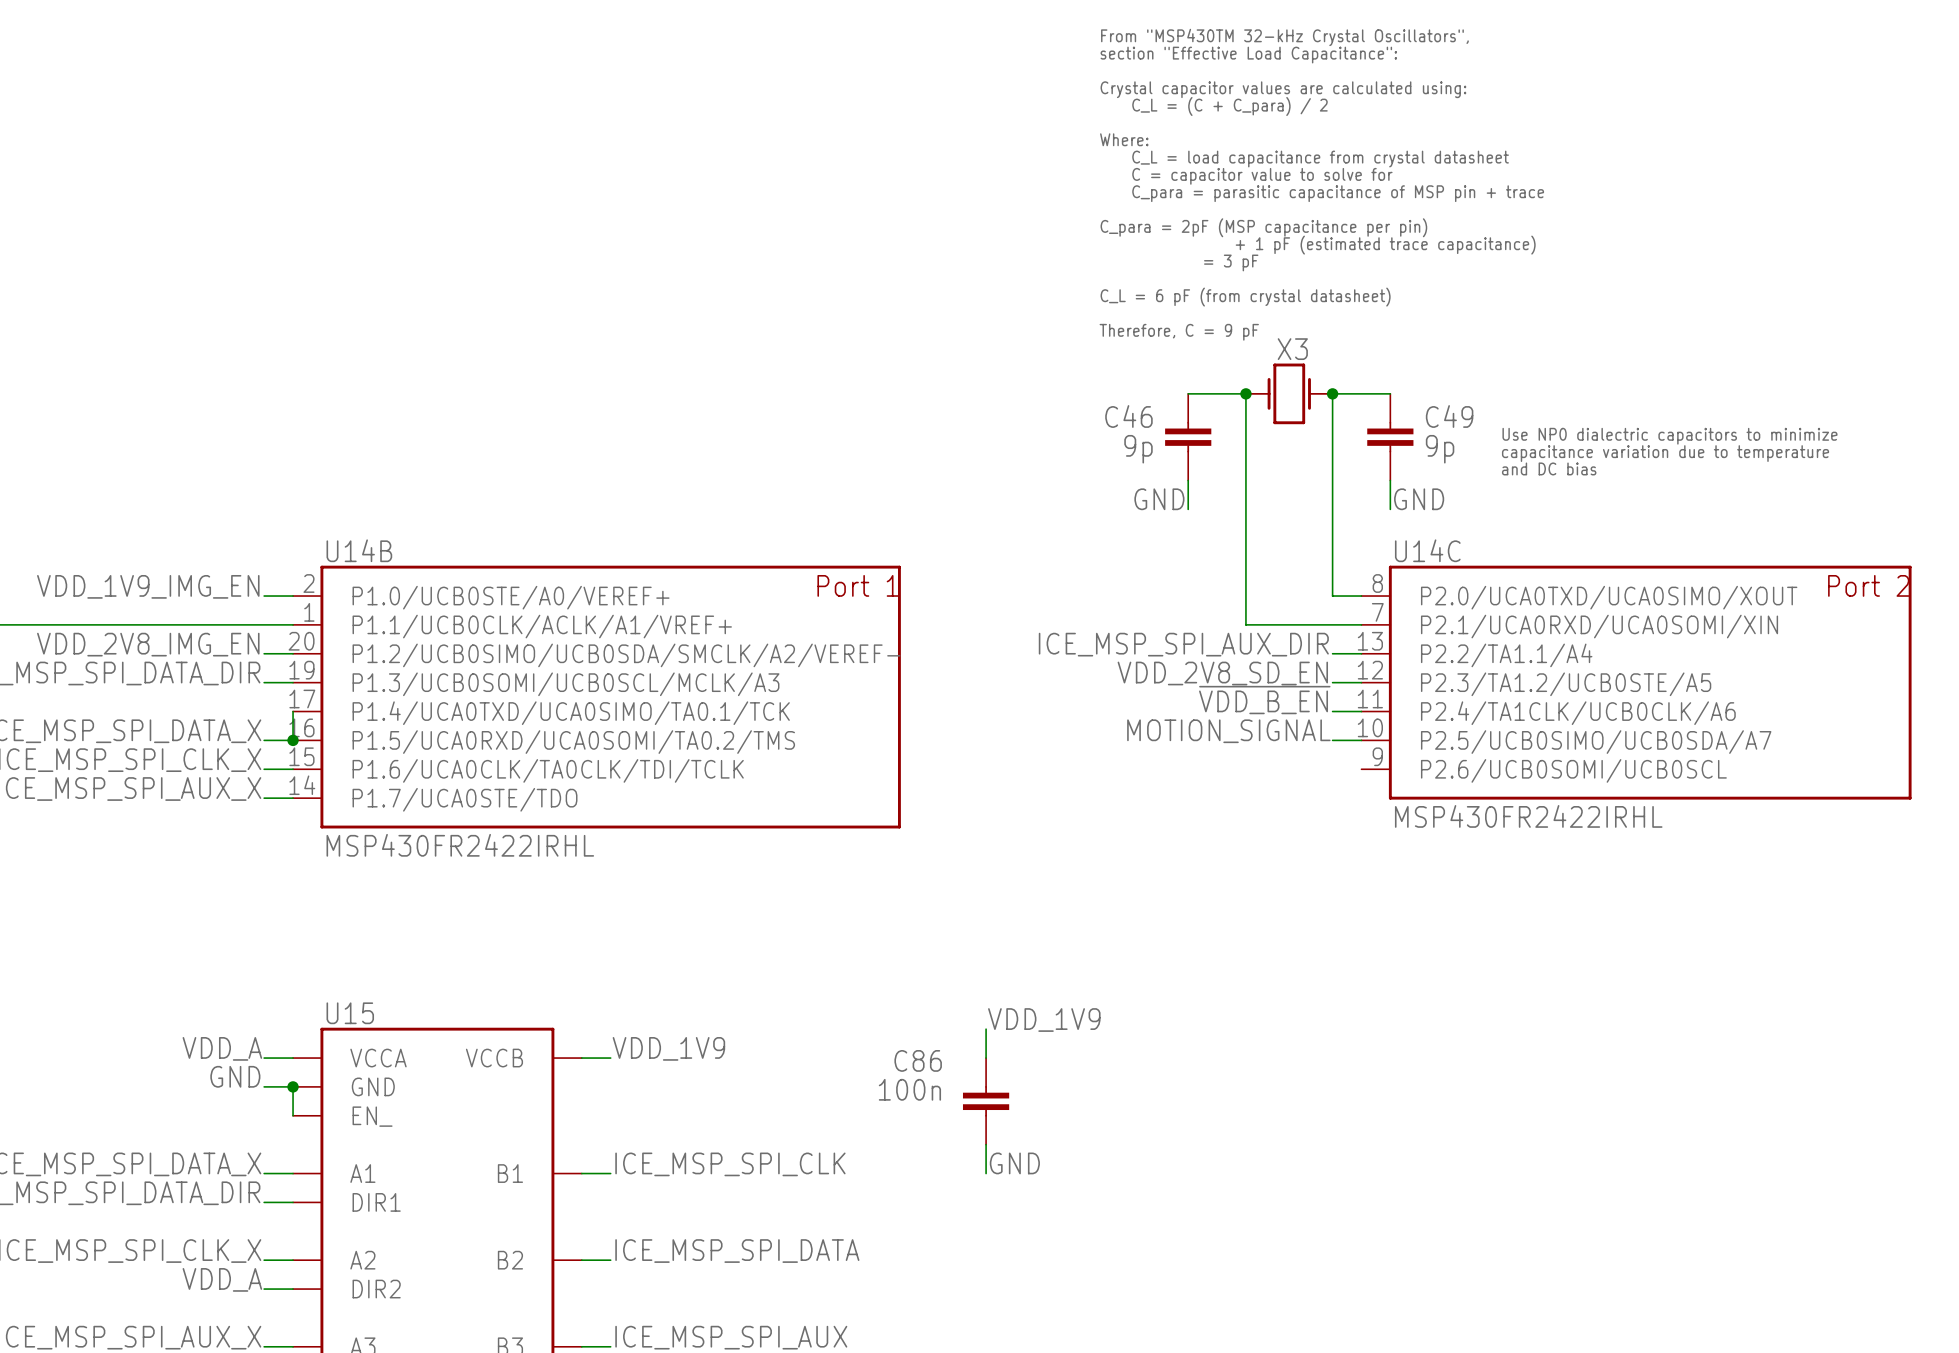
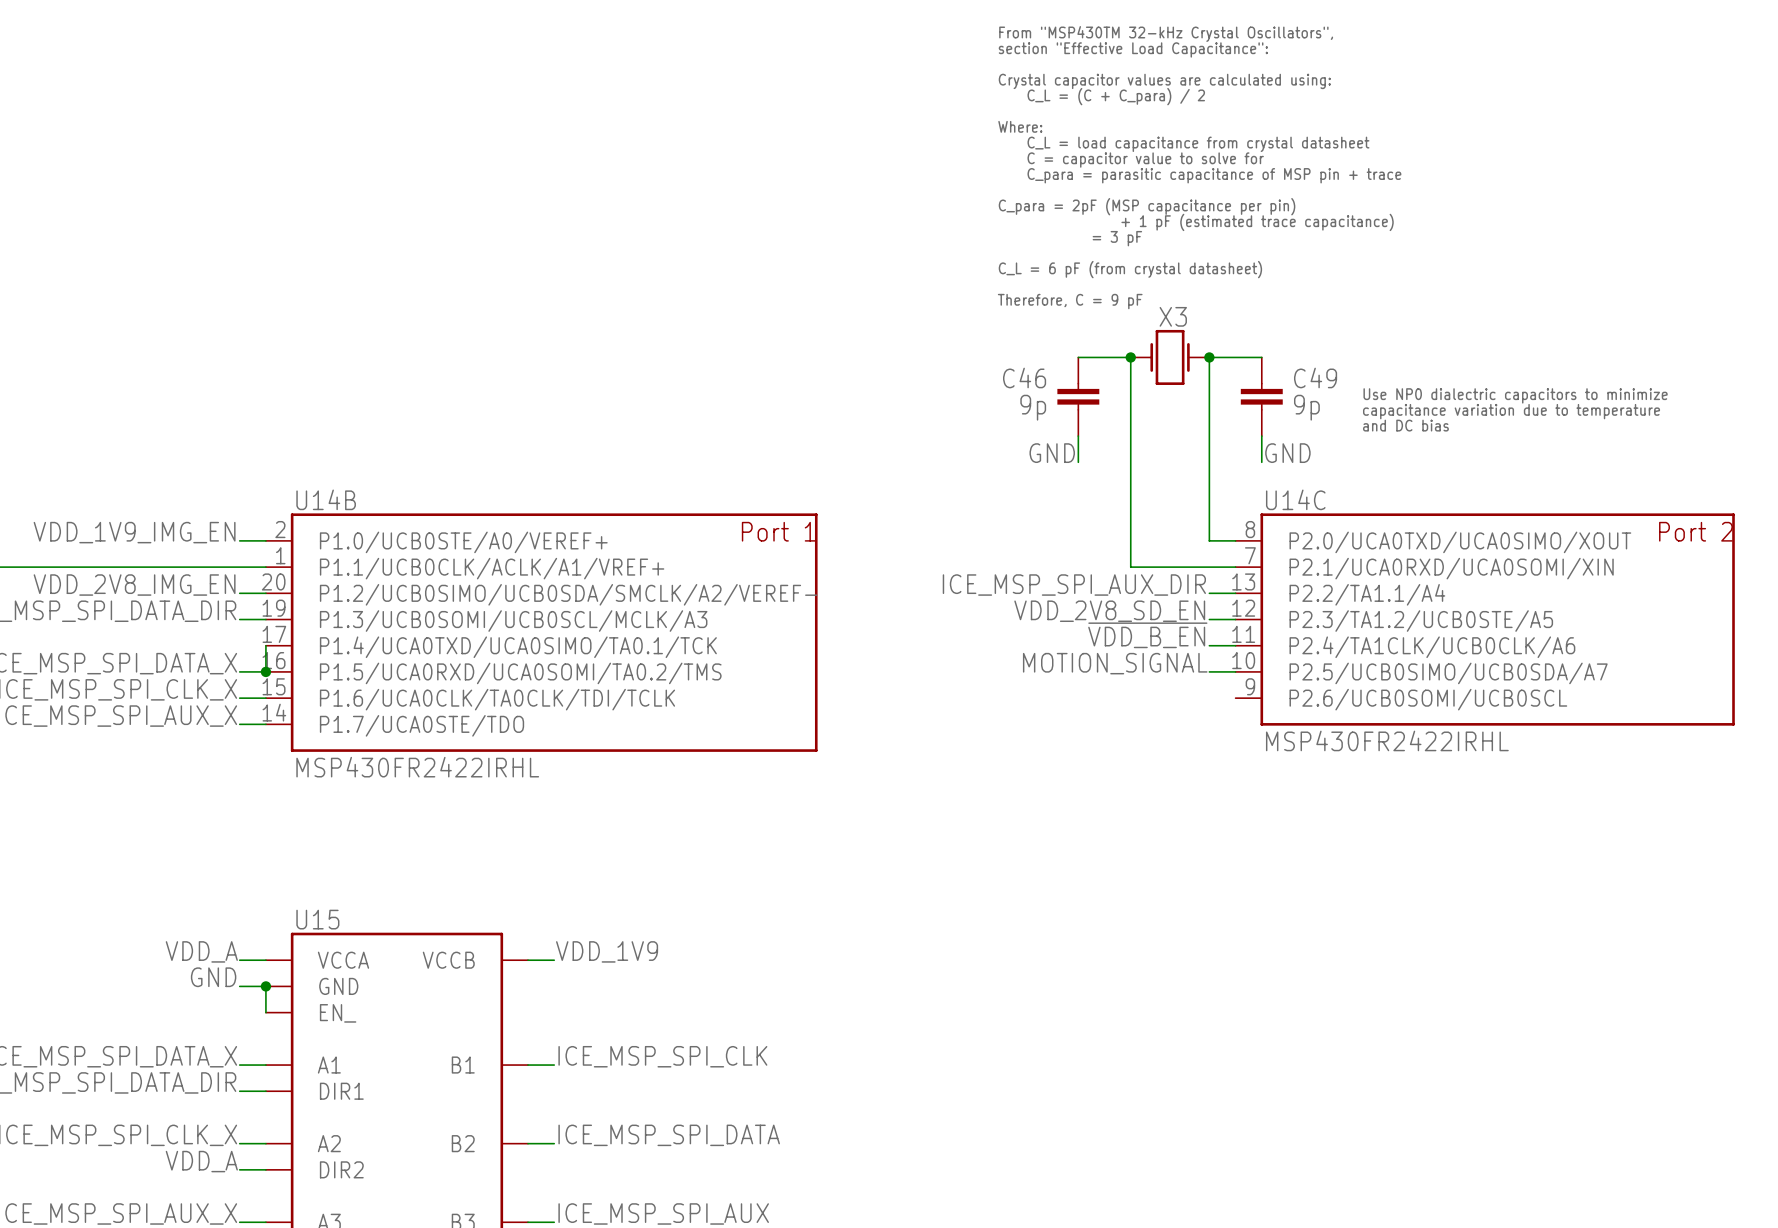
label: VDD_1V9 (1044, 1020) -> none
wire: (986, 1029) (986, 1058) -> none
C86: 100n (986, 1101) -> none
wire: (986, 1144) (986, 1173) -> none
label: GND (1014, 1163) -> none

